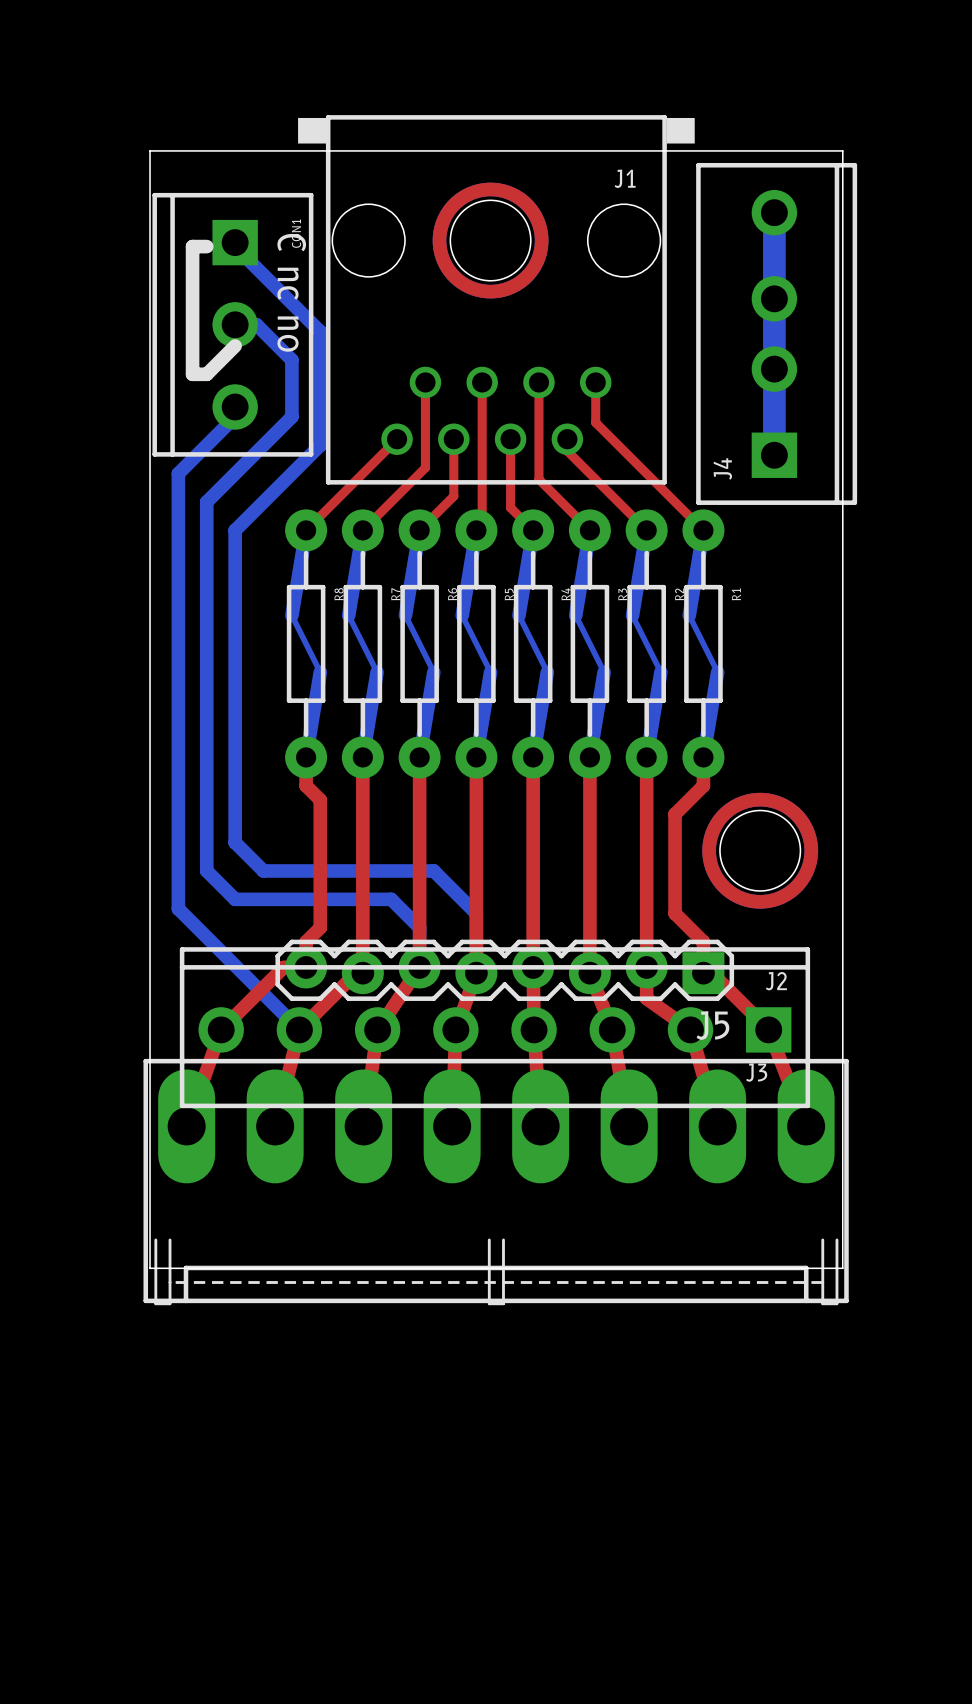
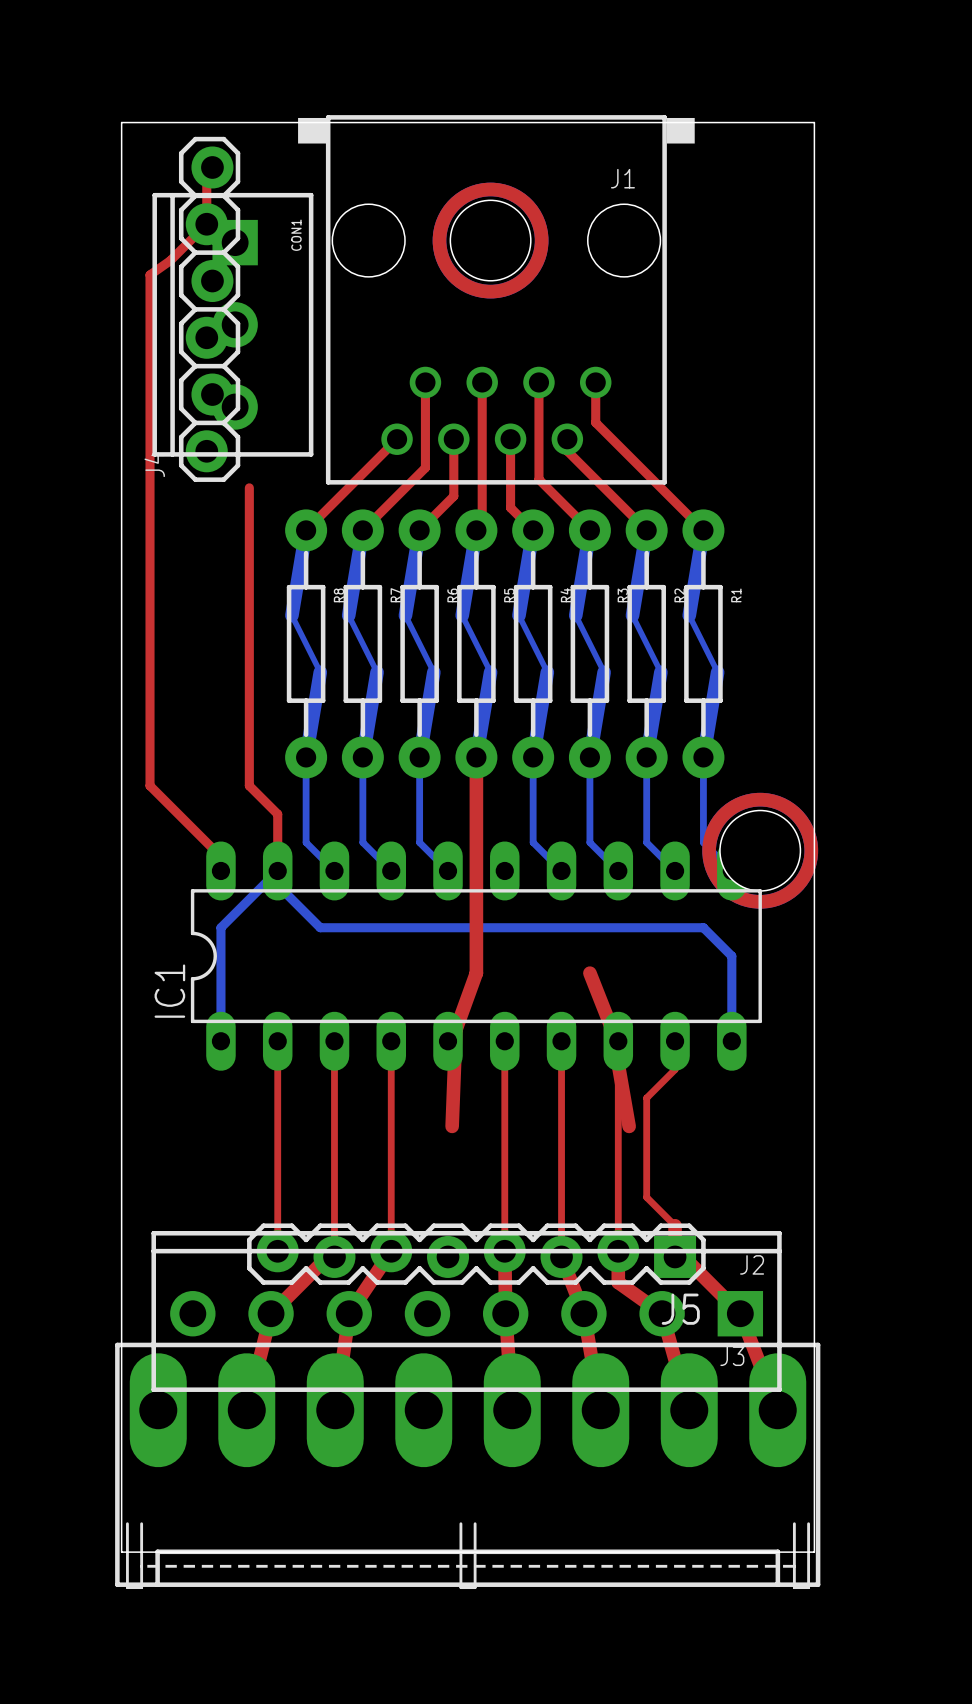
board edge: (150, 150) (842, 150) (842, 1268) (150, 1268) (150, 150) -> (121, 122) (121, 1552) (814, 1552) (814, 122) (121, 122)
J4 footprint: [696, 162, 858, 505] -> [178, 136, 241, 482]
top track: none -> (212, 167) (206, 173) (206, 224) (170, 260) (150, 274) (150, 785) (220, 856) (220, 870)
bottom track: (774, 212) (774, 455) -> none
bottom track: (235, 242) (235, 246) (320, 331) (320, 445) (235, 530) (235, 842) (263, 870) (433, 870) (476, 913) (476, 973) -> none
line: (206, 246) (192, 246) (192, 374) (206, 374) (235, 345) -> none
text: C nc no (291, 292) -> none
bottom track: (235, 324) (256, 324) (291, 360) (291, 416) (206, 502) (206, 870) (235, 899) (391, 899) (419, 927) (419, 967) -> none
bottom track: (235, 416) (178, 473) (178, 908) (299, 1029) -> none
top track: none -> (249, 487) (249, 785) (277, 814) (277, 870)
top track: (306, 757) (306, 785) (320, 800) (320, 927) (306, 941) (306, 967) (283, 967) (221, 1029) (186, 1126) -> none
bottom track: none -> (306, 757) (306, 842) (334, 870)
top track: (362, 757) (362, 973) (356, 973) (299, 1029) (275, 1126) -> (334, 1041) (334, 1256) (327, 1256) (271, 1313) (246, 1410)
bottom track: none -> (362, 757) (362, 842) (391, 870)
top track: (419, 757) (419, 967) (377, 1029) (363, 1126) -> (391, 1041) (391, 1251) (349, 1313) (335, 1410)
bottom track: none -> (419, 757) (419, 842) (448, 870)
top track: (533, 757) (534, 1029) (540, 1126) -> (504, 1041) (505, 1313) (512, 1410)
bottom track: none -> (533, 757) (533, 842) (561, 870)
top track: (589, 757) (589, 982) (595, 987) -> none
bottom track: none -> (589, 757) (589, 842) (618, 870)
top track: (646, 757) (646, 998) (690, 1029) (717, 1126) -> none
bottom track: none -> (646, 757) (646, 842) (675, 870)
top track: (703, 757) (703, 785) (675, 814) (675, 913) (703, 941) (703, 973) (711, 973) (768, 1029) (806, 1126) -> (675, 1041) (675, 1069) (646, 1098) (646, 1197) (675, 1225) (675, 1256) (683, 1256) (740, 1313) (777, 1410)
bottom track: none -> (703, 757) (703, 842) (731, 870)
IC1: none -> (476, 956)
J5 position: (504, 970) -> (476, 1254)
J2 position: (494, 1027) -> (466, 1311)
bottom track: none -> (220, 1041) (220, 927) (277, 870) (277, 885) (320, 927) (703, 927) (731, 956) (731, 1041)
top track: none -> (277, 1041) (277, 1239)
top track: none -> (561, 1041) (561, 1256) (583, 1313) (600, 1410)
top track: none -> (618, 1041) (618, 1282) (662, 1313) (689, 1410)
J3 position: (496, 1182) -> (467, 1465)

